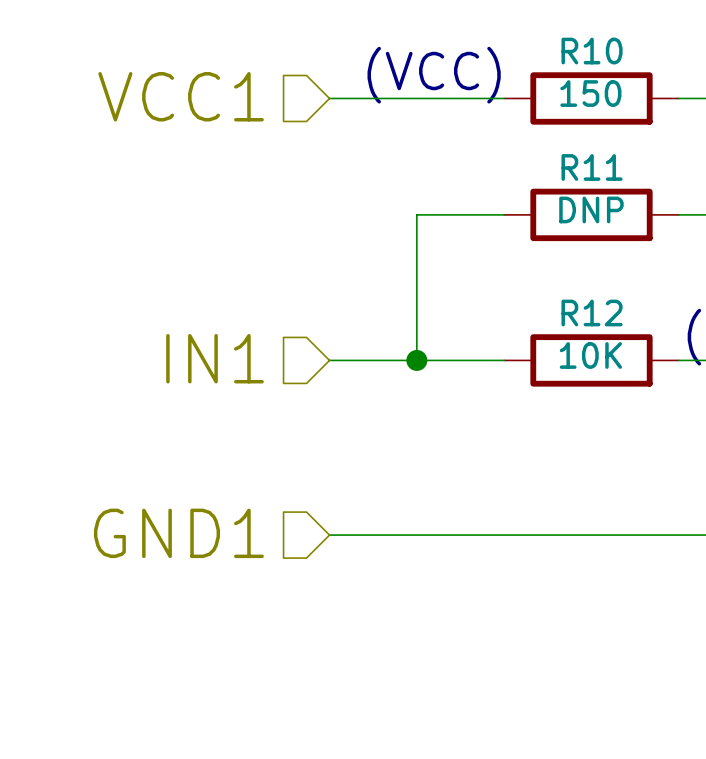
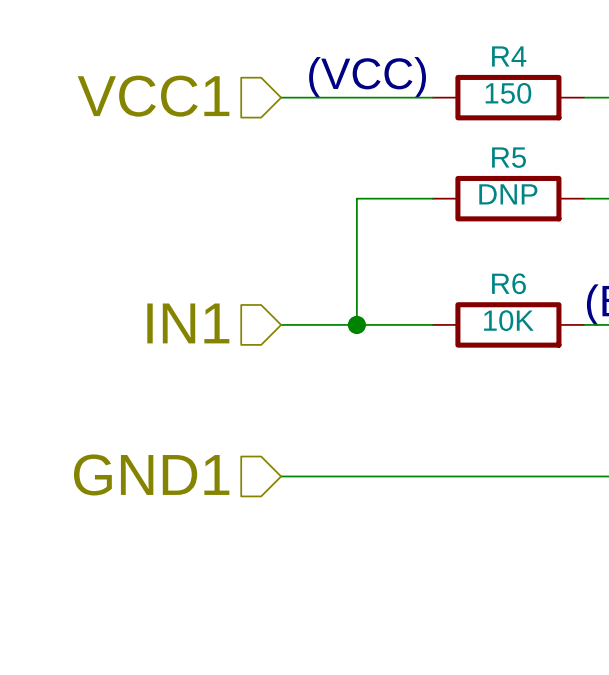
R10 name: R10 (592, 51) -> R4 (509, 56)
R11 name: R11 (592, 167) -> R5 (509, 157)
R12 name: R12 (592, 312) -> R6 (508, 283)

